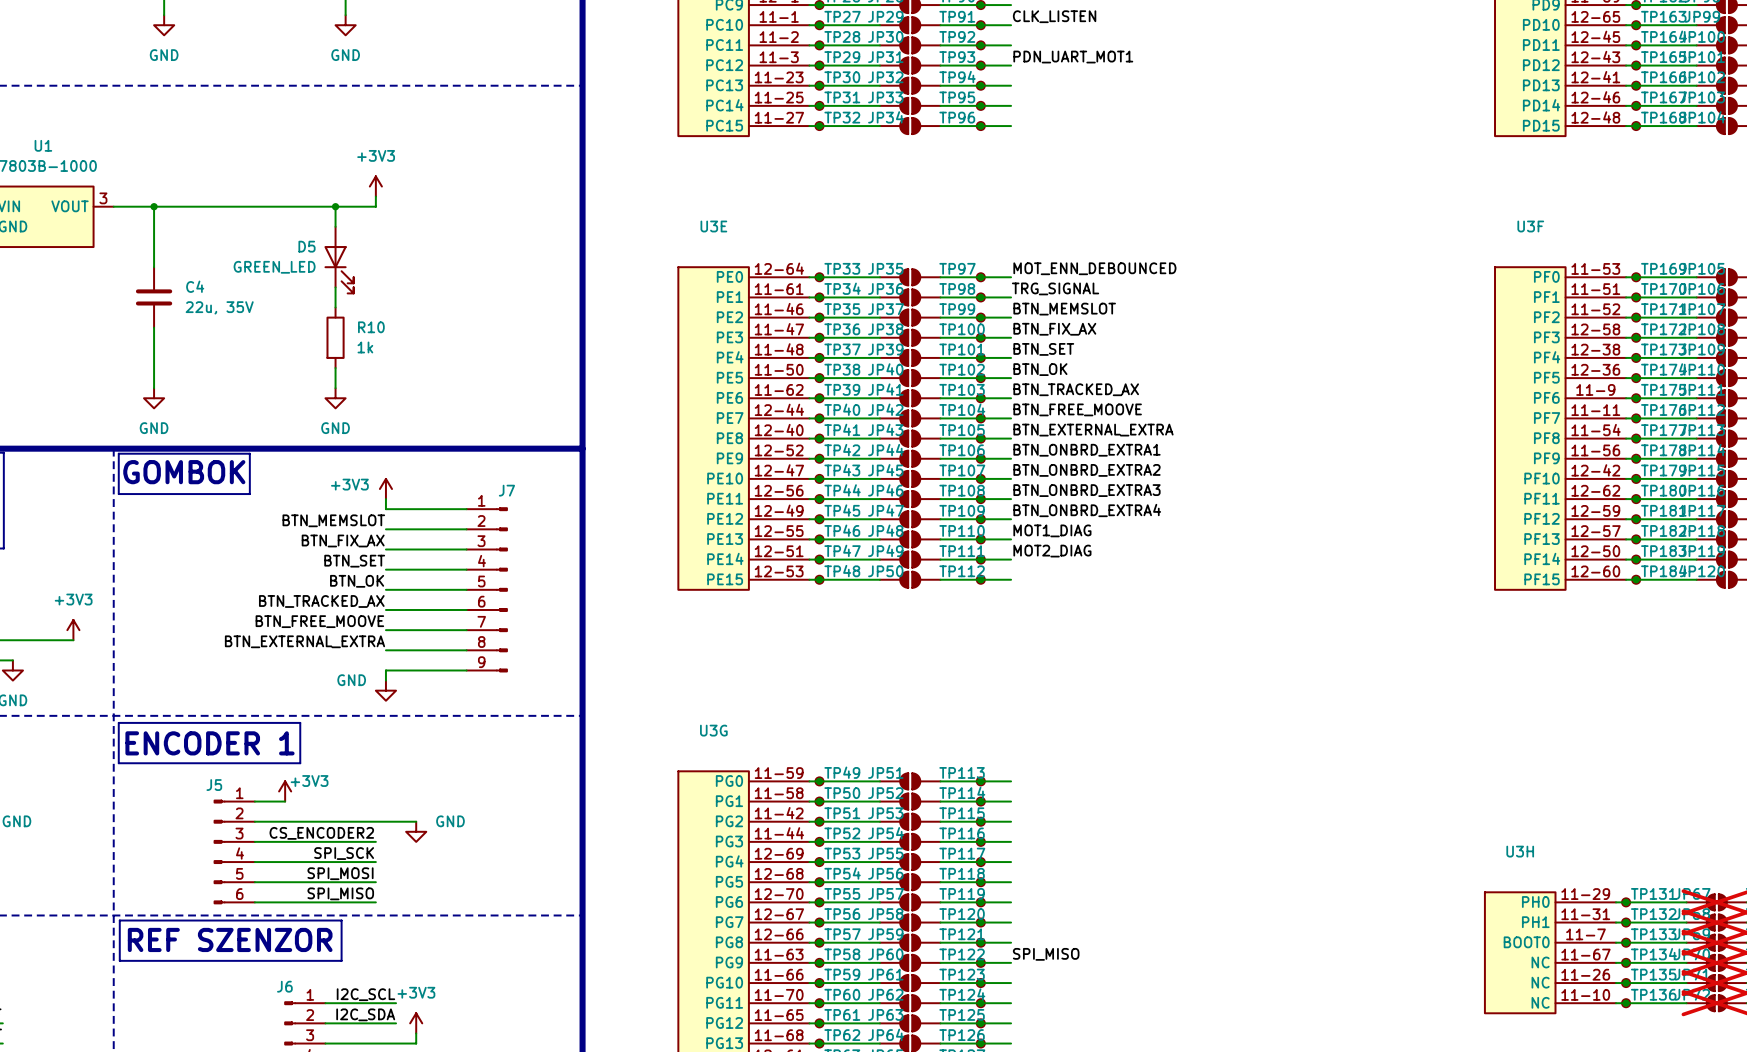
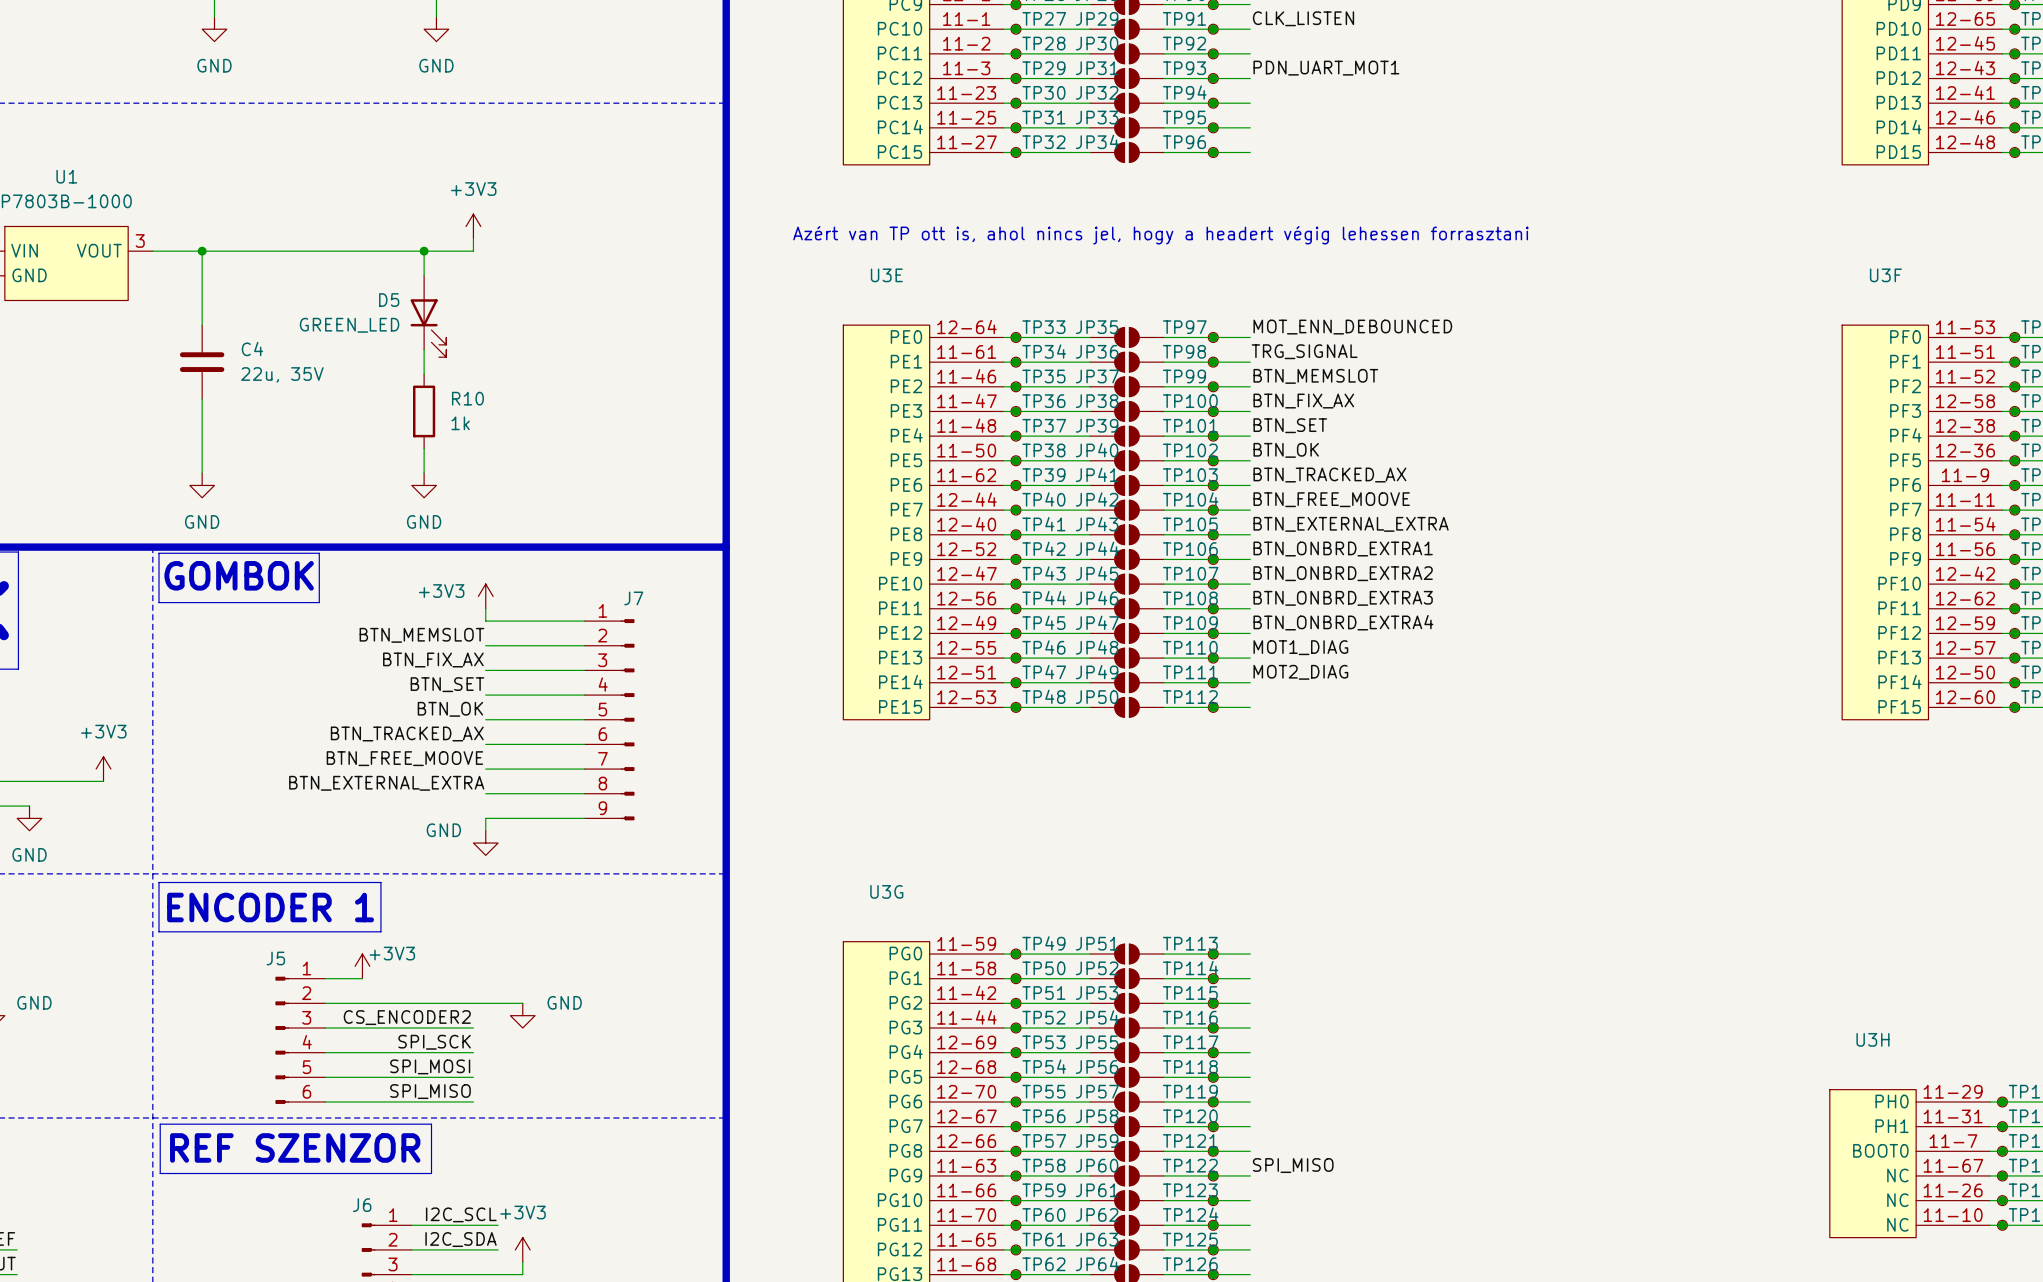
text: none -> Azért van TP ott is, ahol nincs jel, hogy a headert végig lehessen forrasztani (1160, 235)

